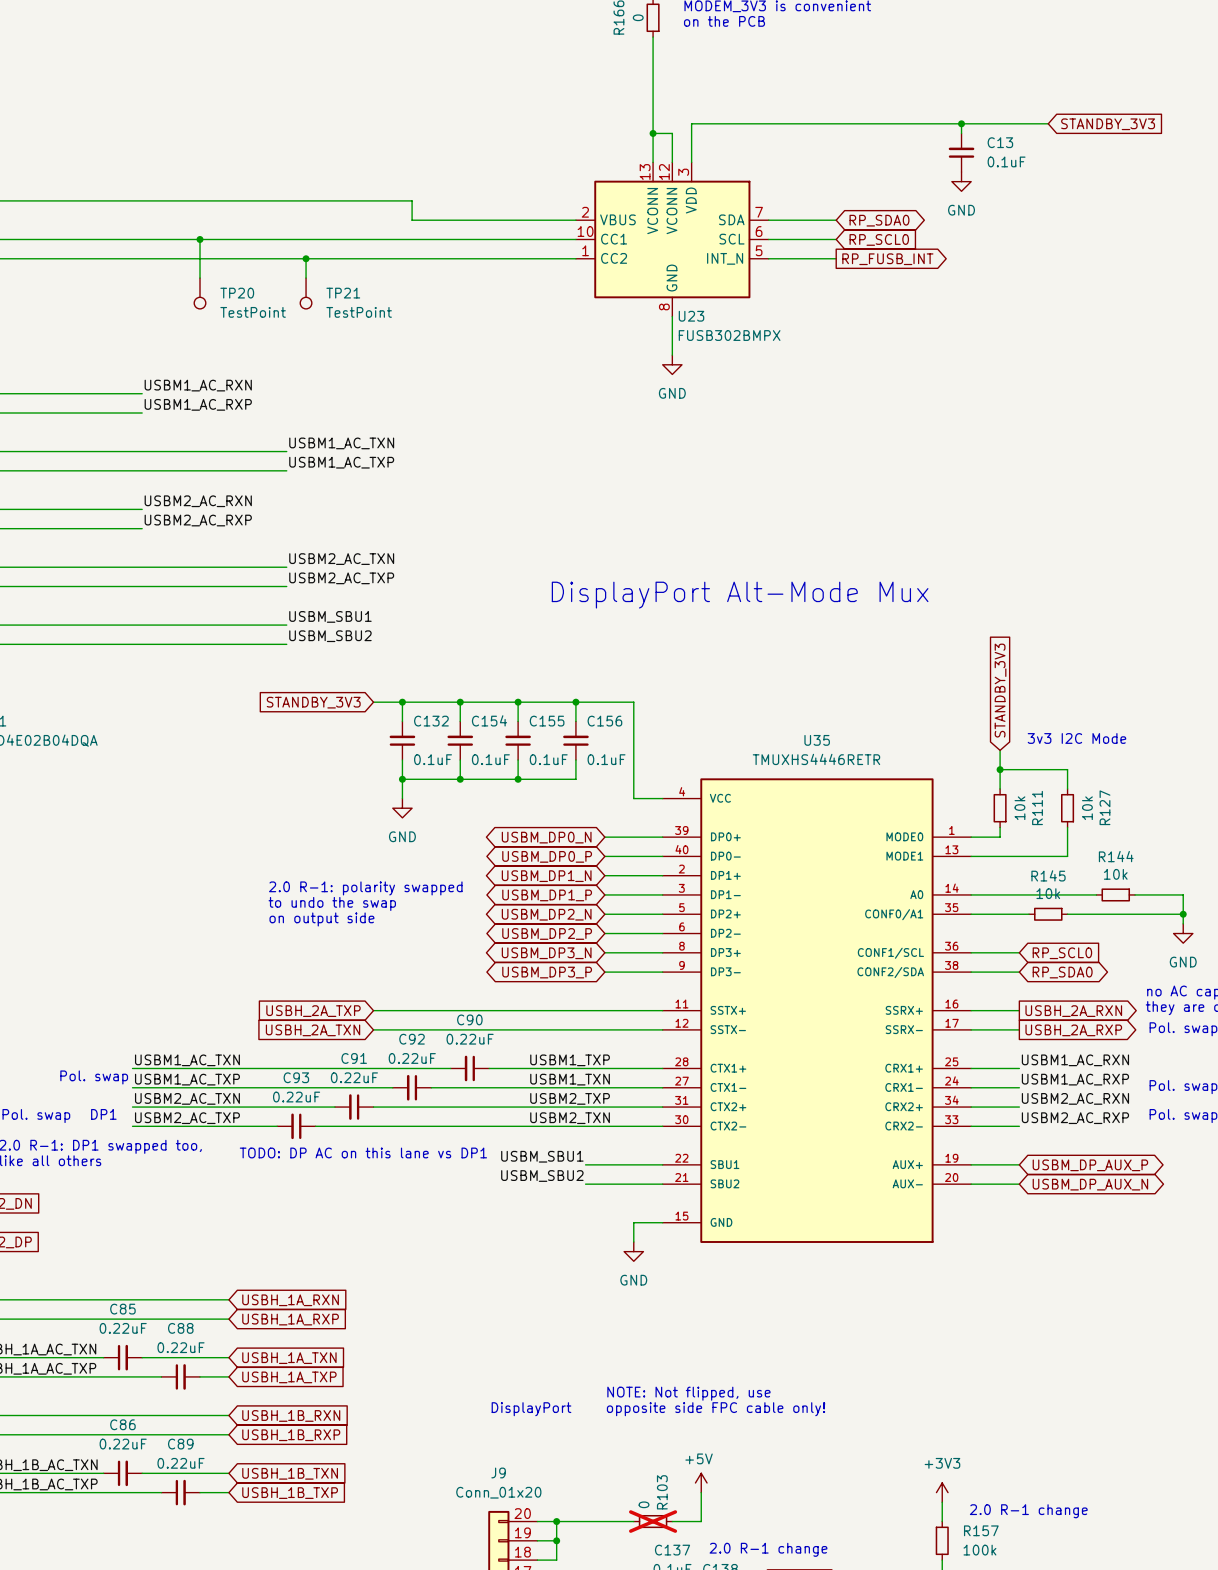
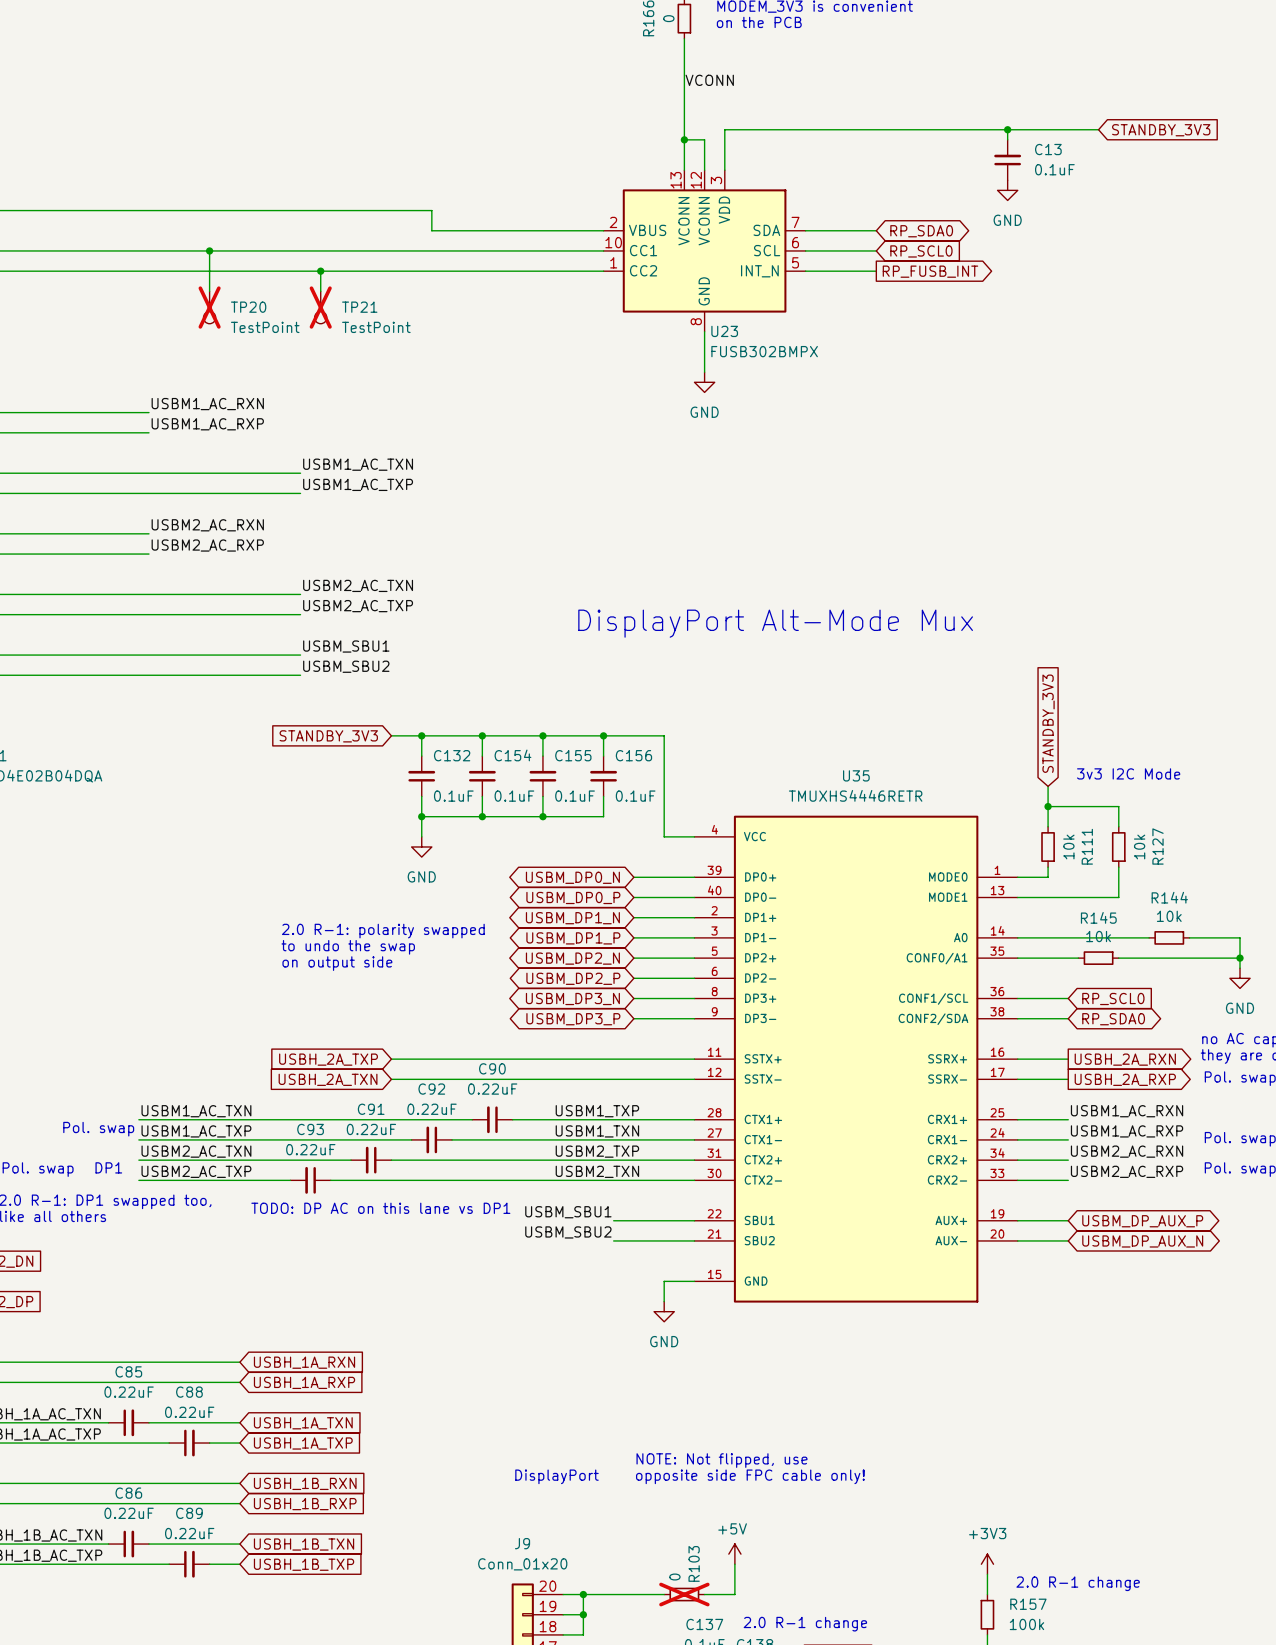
label: none -> VCONN (709, 80)
TP20 do-not-place cross: none -> (209, 307)
TP21 do-not-place cross: none -> (320, 307)

